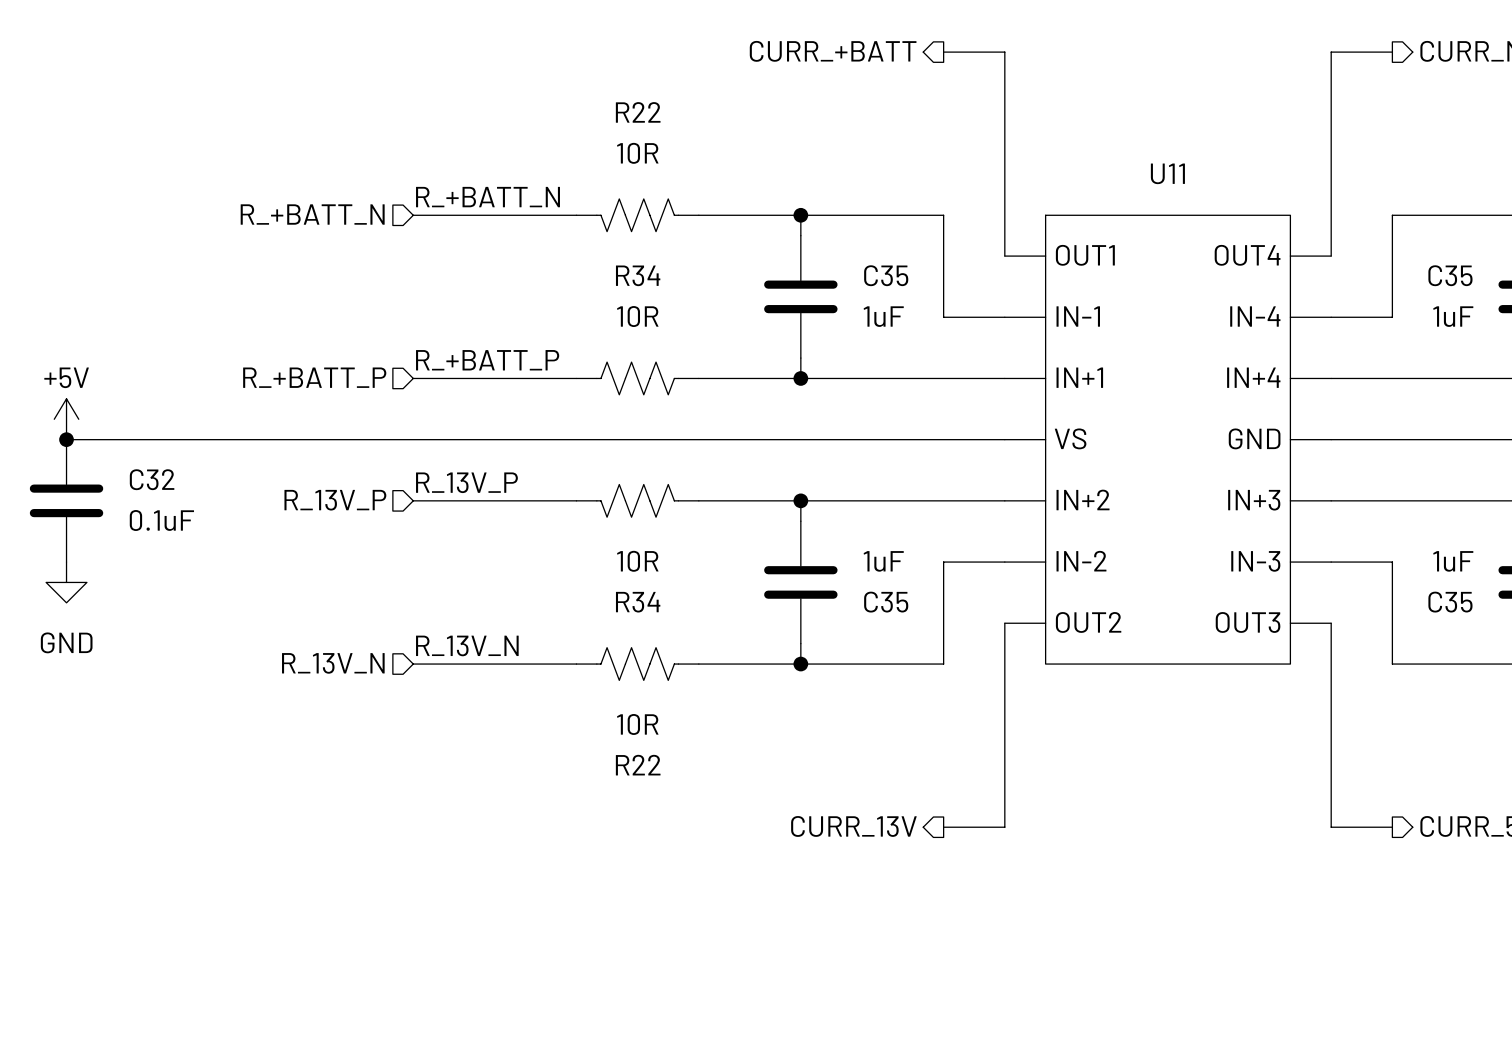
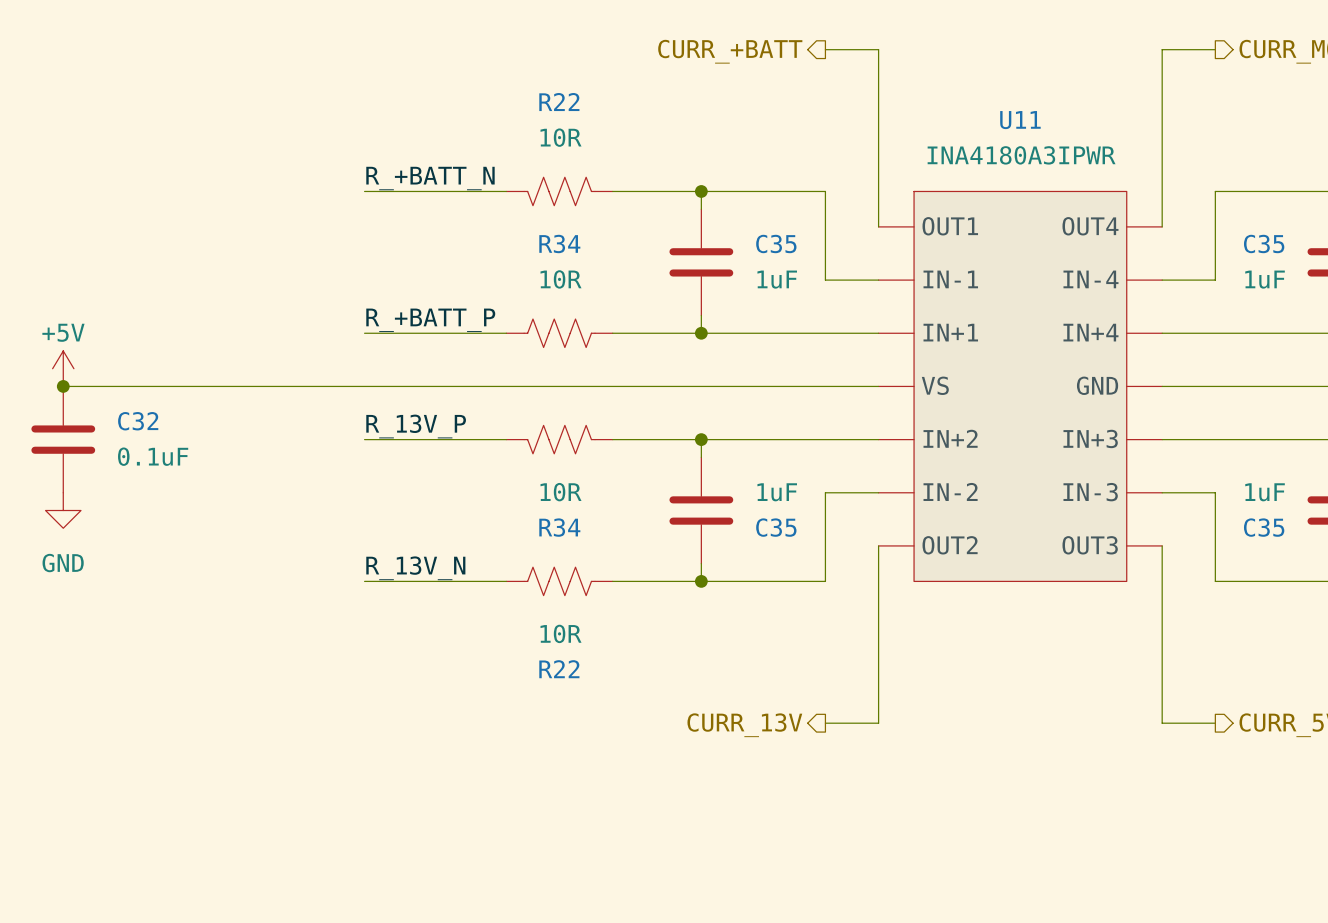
U11 name position: U11 (1167, 173) -> U11 (1020, 120)
U11 value: none -> INA4180A3IPWR (1021, 155)
hierarchical label: R_+BATT_N (312, 214) -> none
hierarchical label: R_+BATT_P (314, 377) -> none
hierarchical label: R_13V_P (335, 500) -> none
hierarchical label: R_13V_N (333, 663) -> none

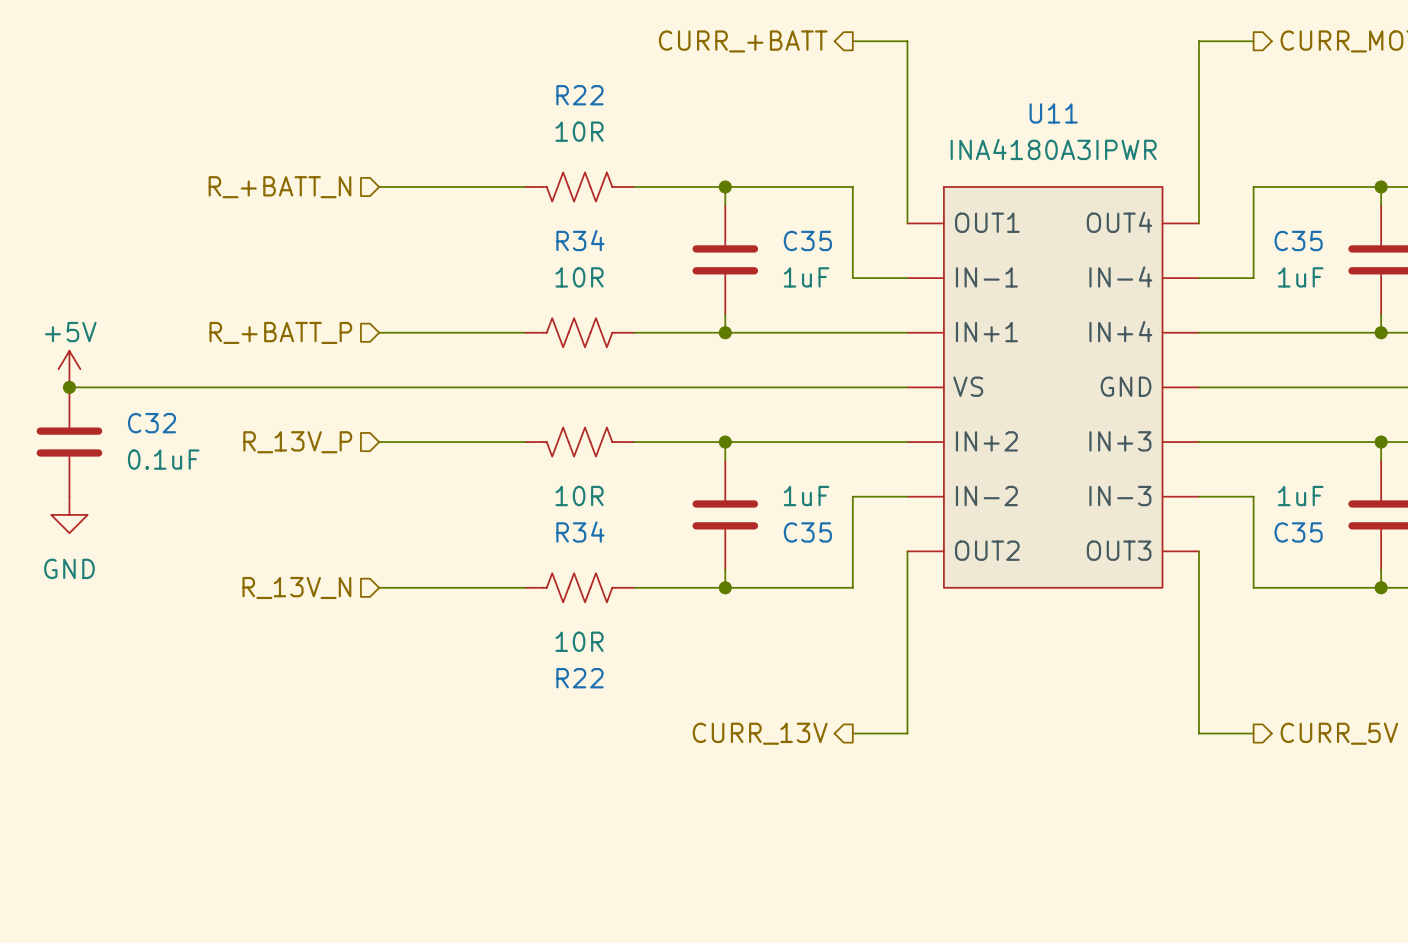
label: R_+BATT_N (430, 178) -> none
hierarchical label: none -> R_+BATT_N (279, 187)
label: R_+BATT_P (430, 320) -> none
hierarchical label: none -> R_+BATT_P (280, 332)
label: R_13V_P (416, 426) -> none
hierarchical label: none -> R_13V_P (297, 442)
label: R_13V_N (415, 568) -> none
hierarchical label: none -> R_13V_N (296, 587)

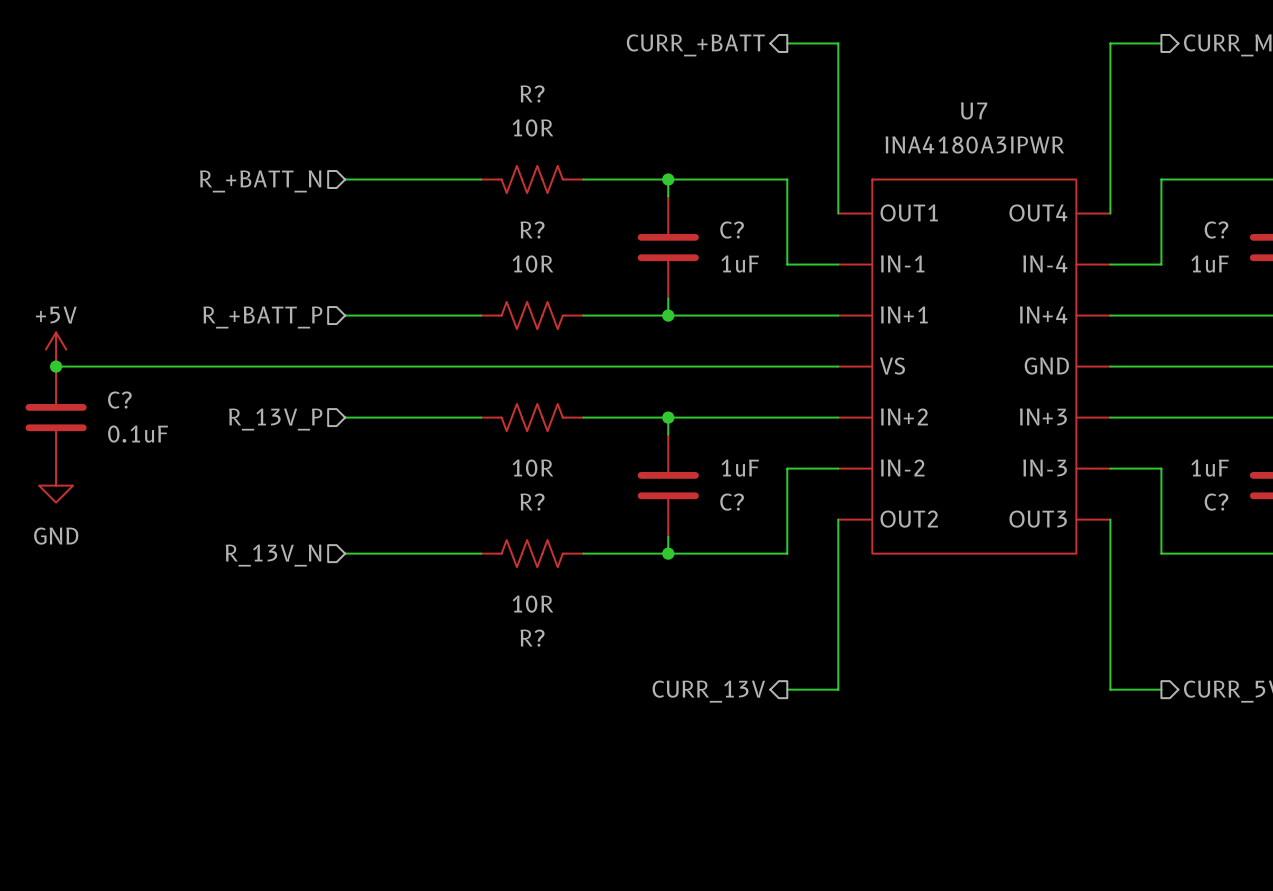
R22 name: R22 (579, 95) -> R? (532, 93)
U11 name: U11 (1053, 113) -> U7 (974, 110)
R34 name: R34 (580, 240) -> R? (532, 229)
C35 name: C35 (807, 240) -> C? (732, 230)
C35 name: C35 (1298, 240) -> C? (1216, 230)
C32 name: C32 (152, 423) -> C? (119, 400)
R34 name: R34 (580, 532) -> R? (532, 502)
C35 name: C35 (807, 532) -> C? (732, 502)
C35 name: C35 (1298, 532) -> C? (1216, 502)
R22 name: R22 (579, 678) -> R? (532, 638)

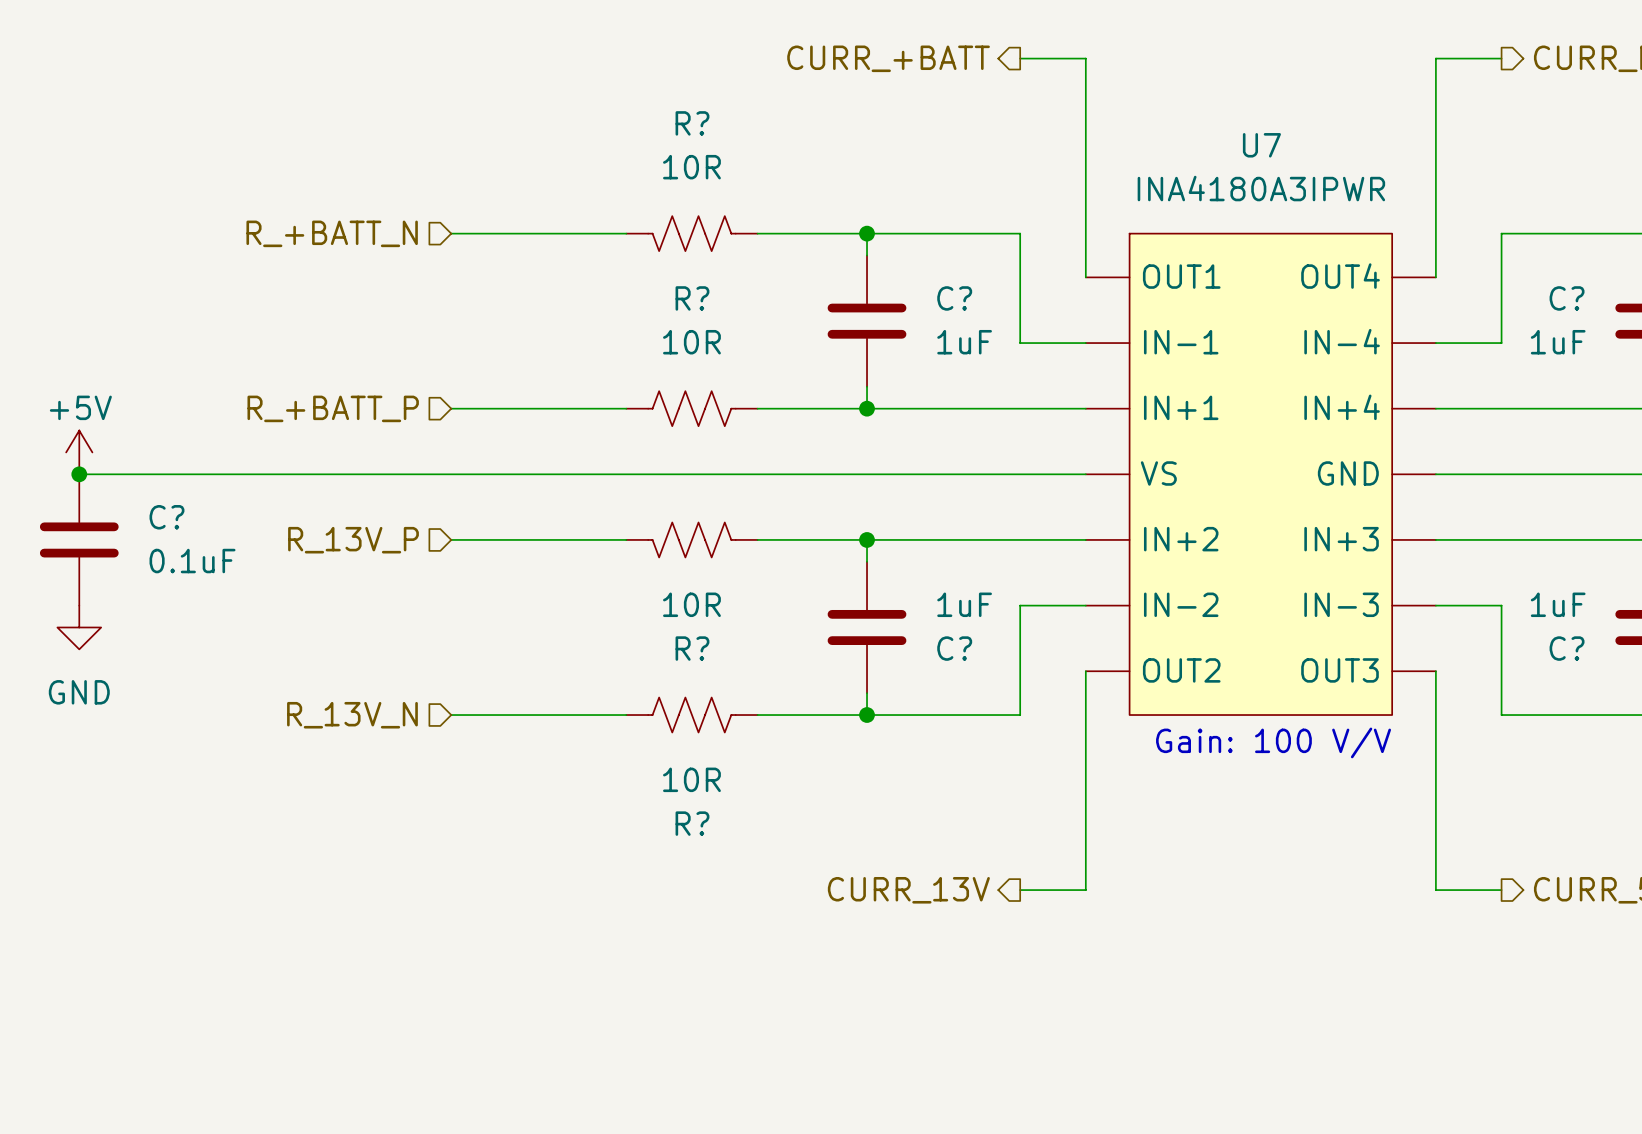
text: none -> Gain: 100 V/V (1273, 742)

